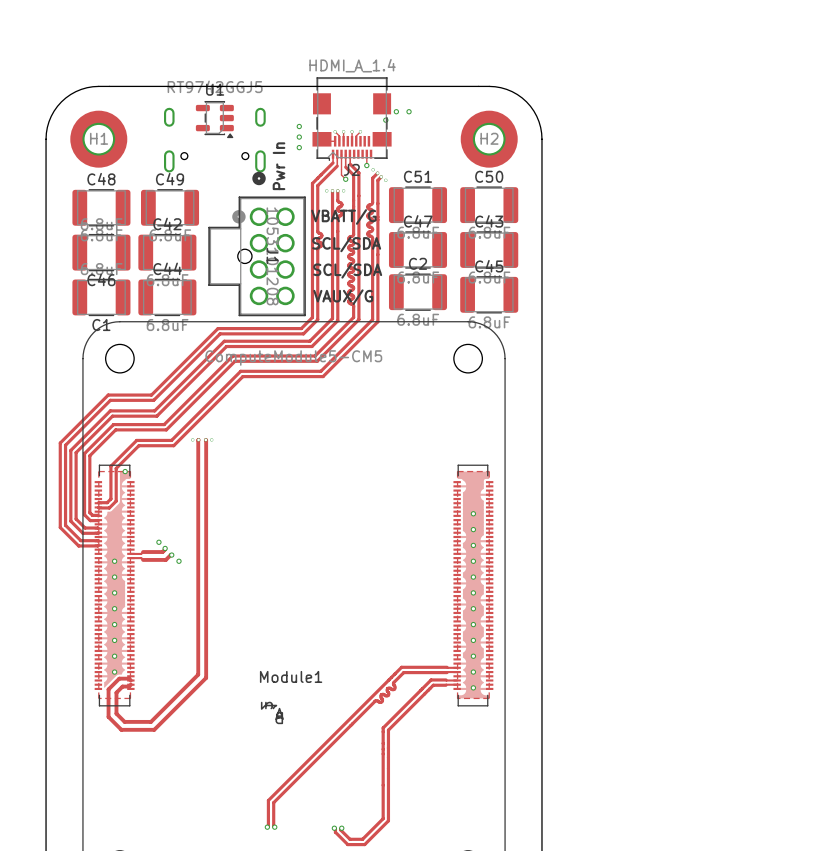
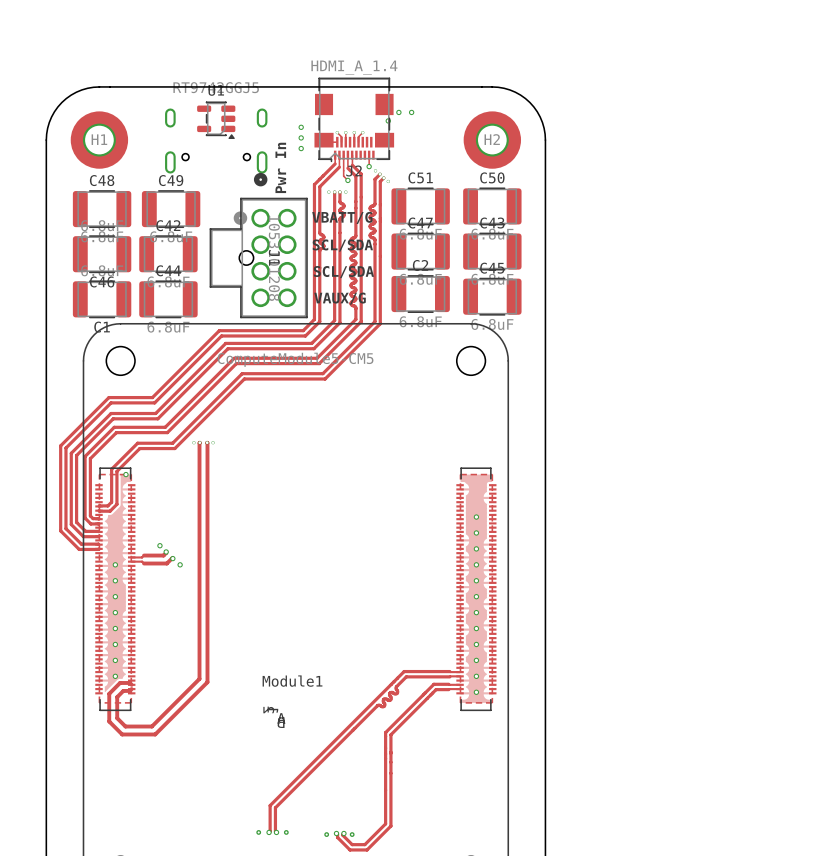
via: none -> (258, 832)
via: none -> (286, 832)
via: none -> (326, 834)
via: none -> (352, 834)

